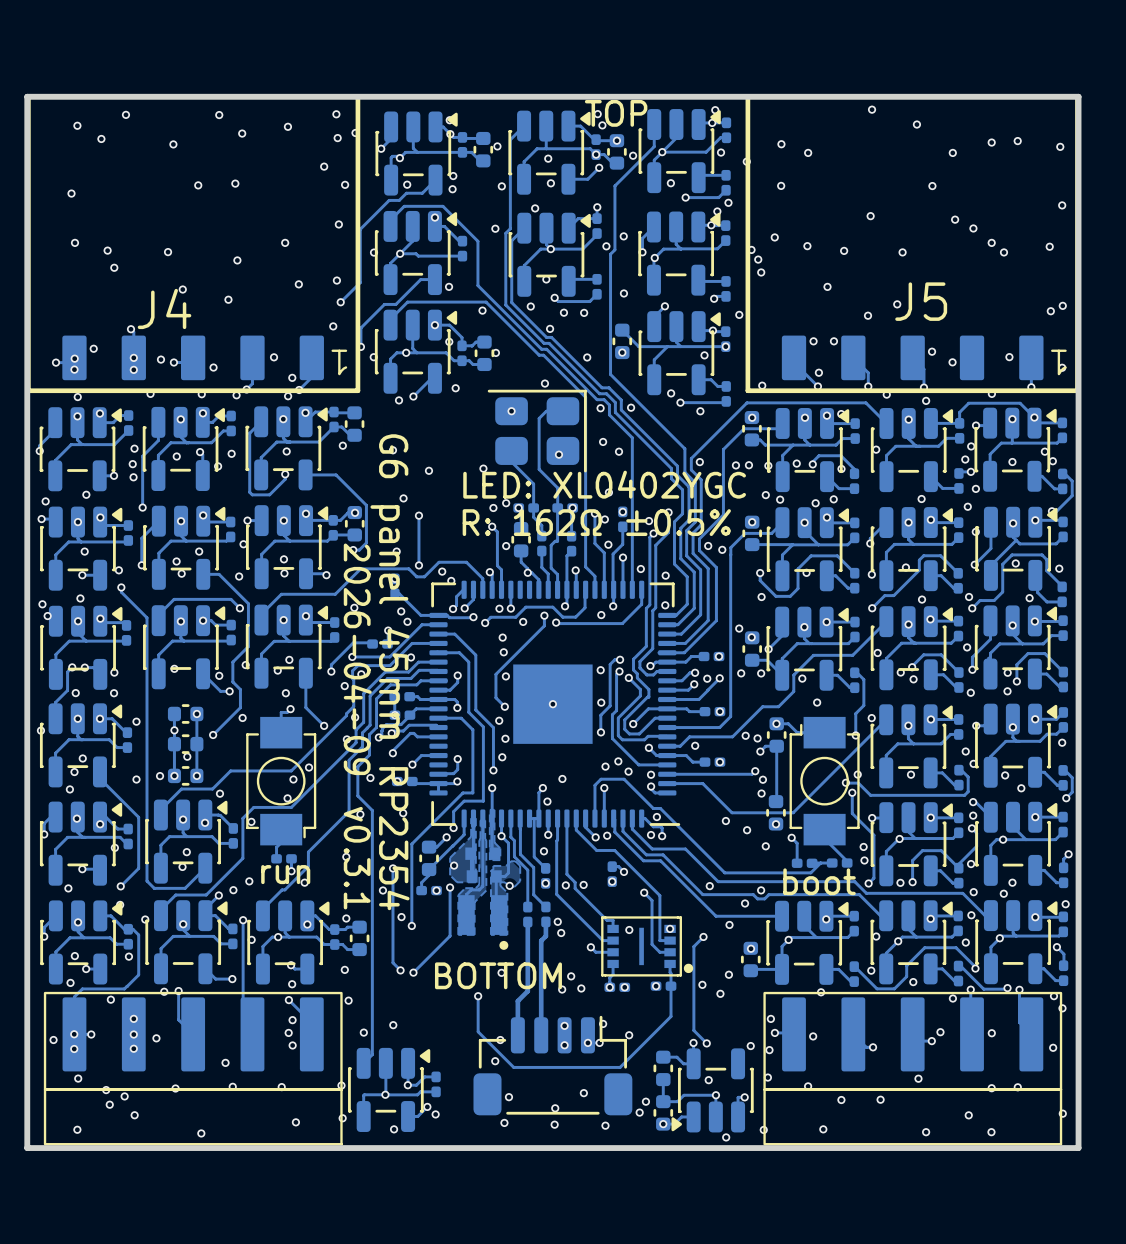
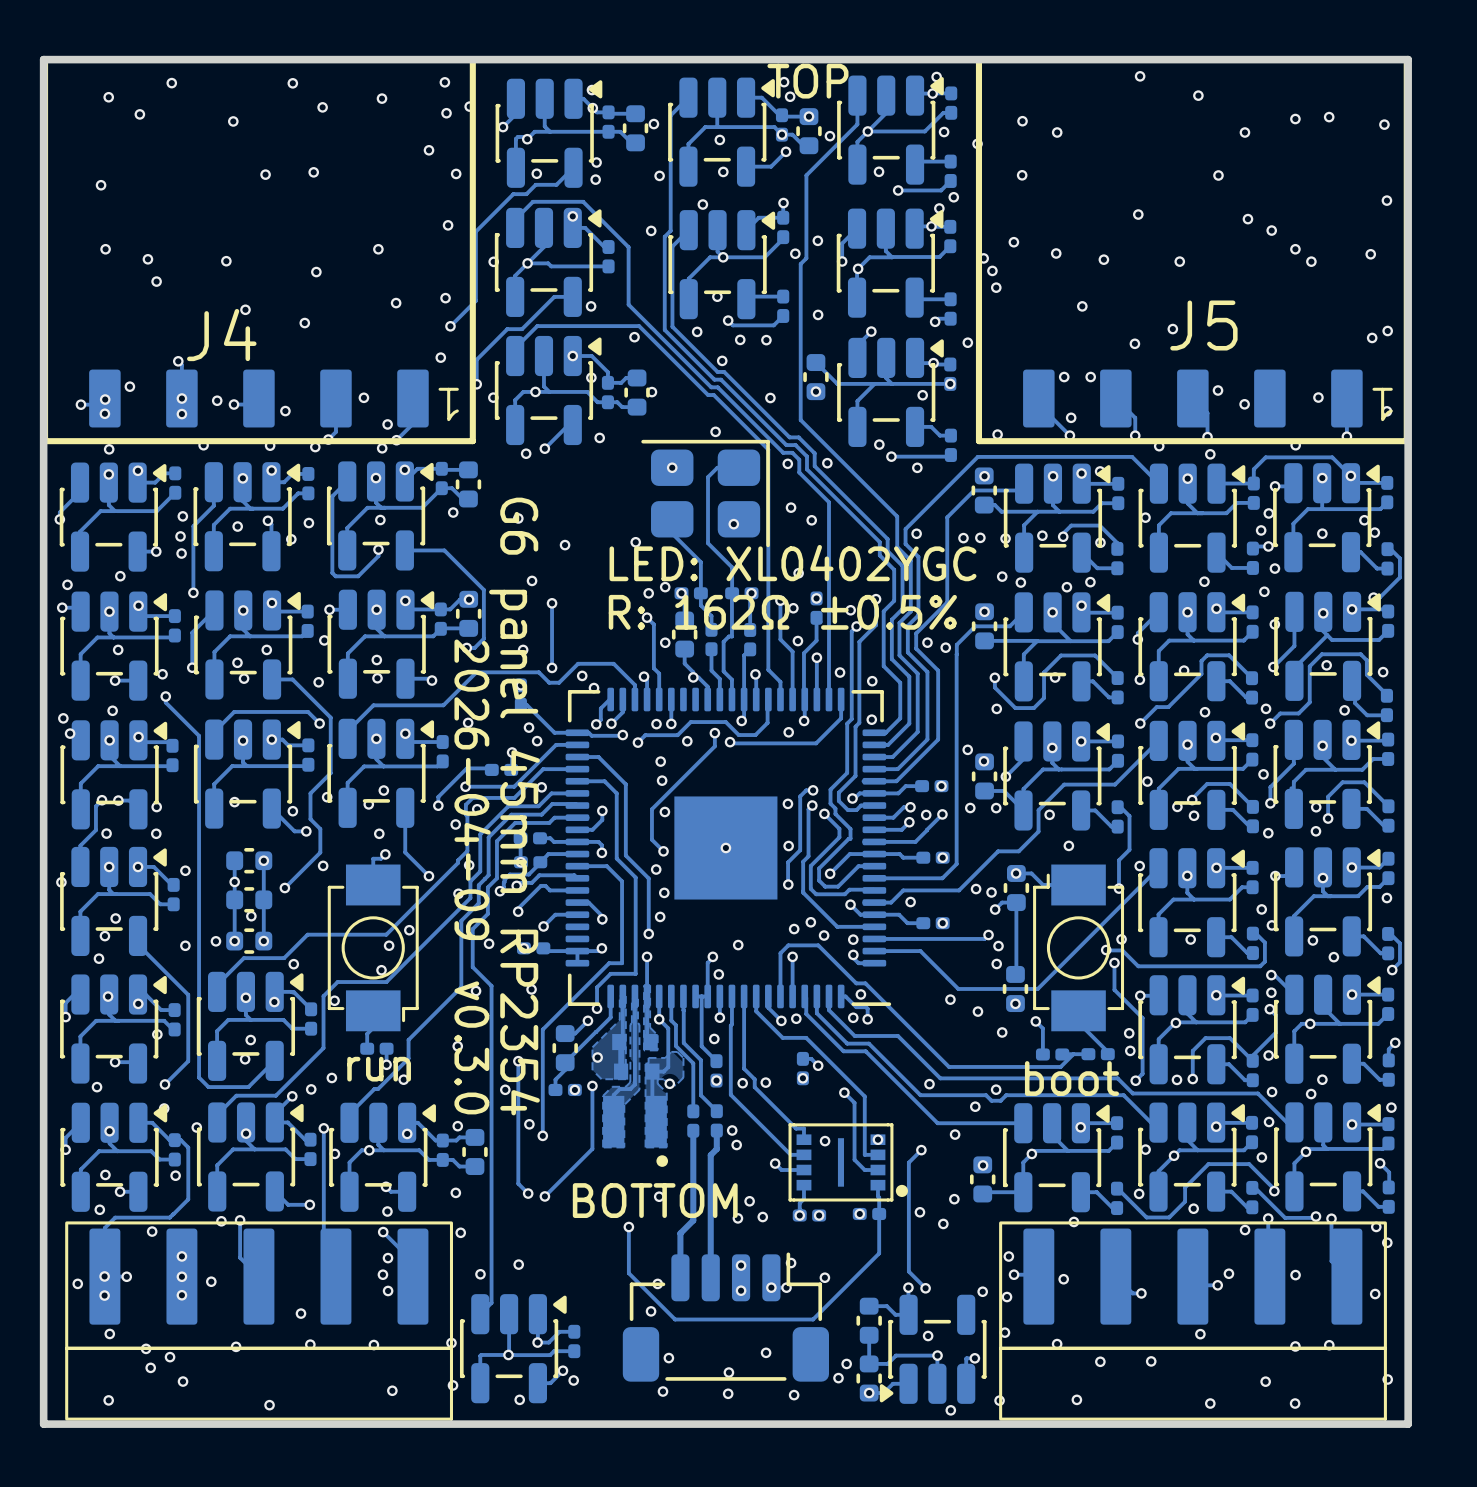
track: none -> (577, 902) (588, 902) (603, 917)
track: (457, 761) (457, 769) (453, 773) (438, 774) -> none
text: v0.3.1 (357, 858) -> v0.3.0 (471, 1047)

